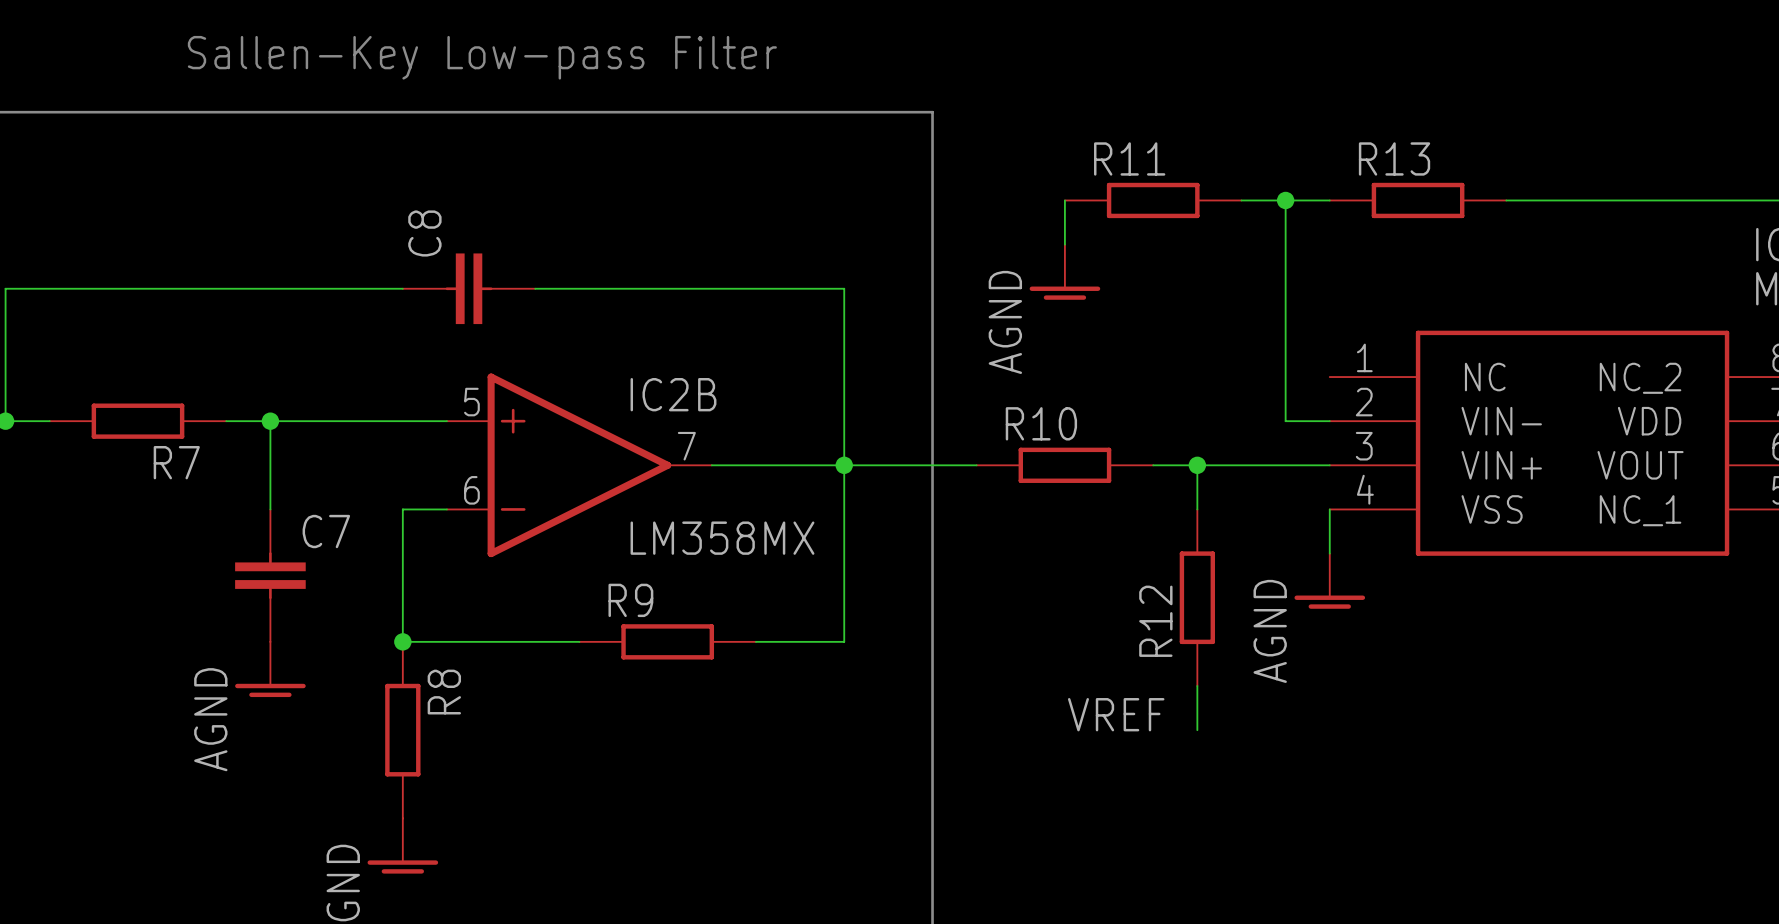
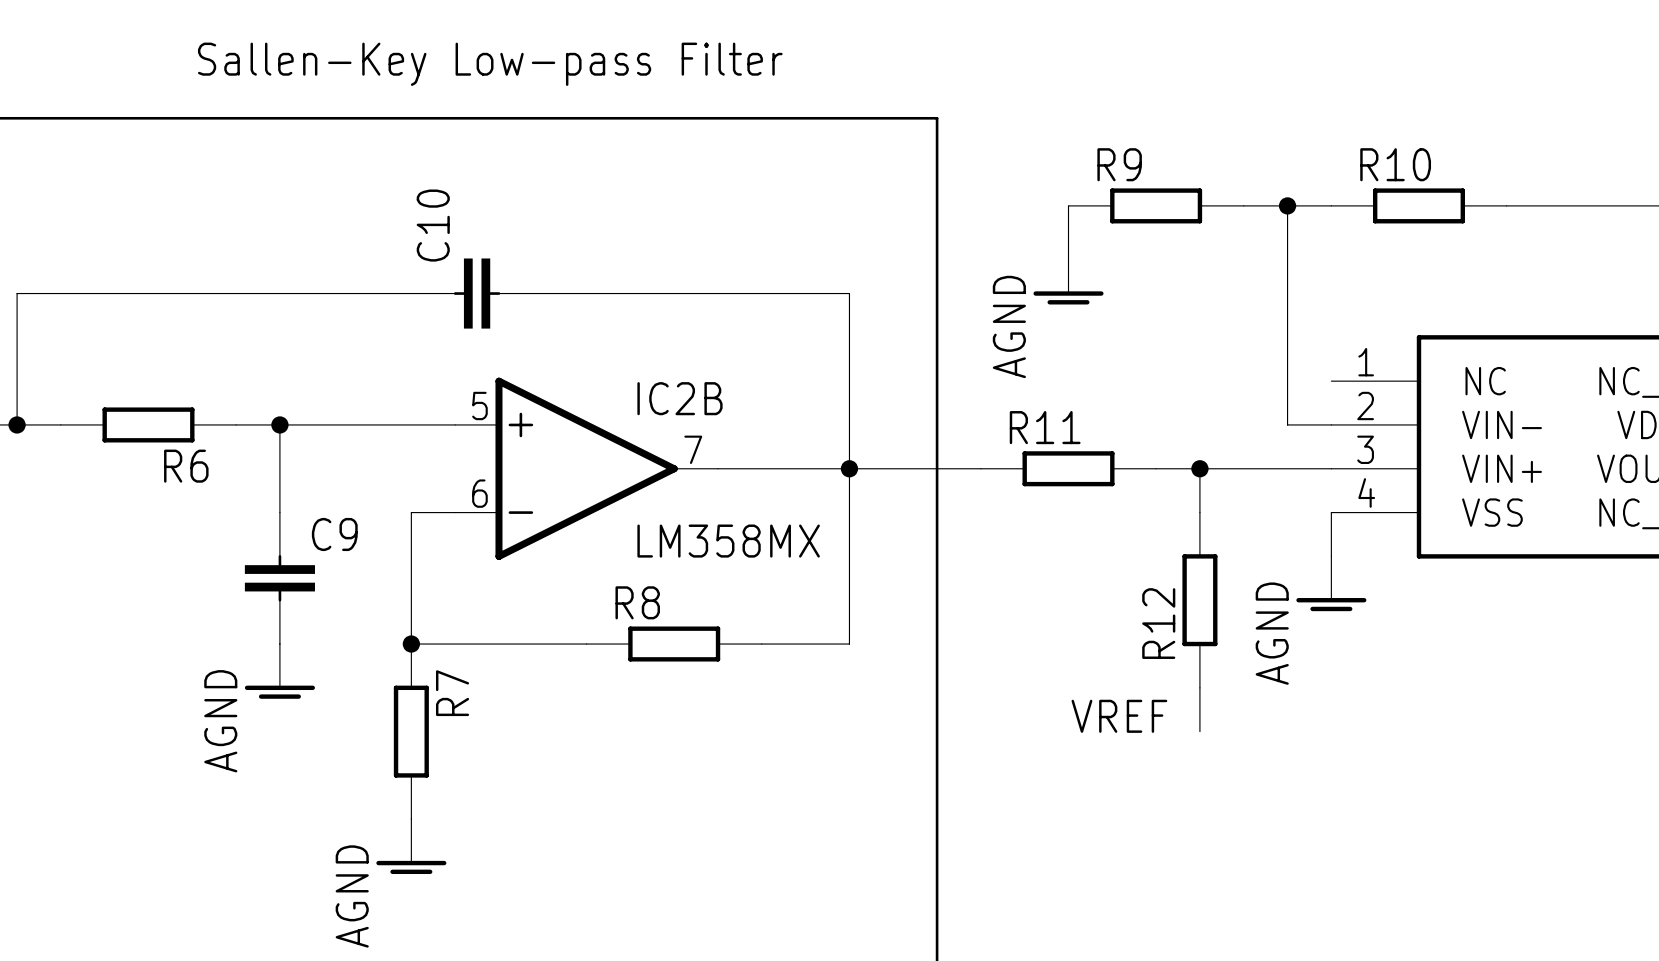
R11 name: R11 (1129, 158) -> R9 (1119, 164)
R13 name: R13 (1394, 158) -> R10 (1395, 164)
C8 name: C8 (424, 233) -> C10 (433, 225)
R10 name: R10 (1041, 423) -> R11 (1045, 427)
R7 name: R7 (176, 462) -> R6 (186, 466)
C7 name: C7 (326, 531) -> C9 (334, 534)
R9 name: R9 (630, 600) -> R8 (637, 602)
R8 name: R8 (444, 692) -> R7 (452, 693)

